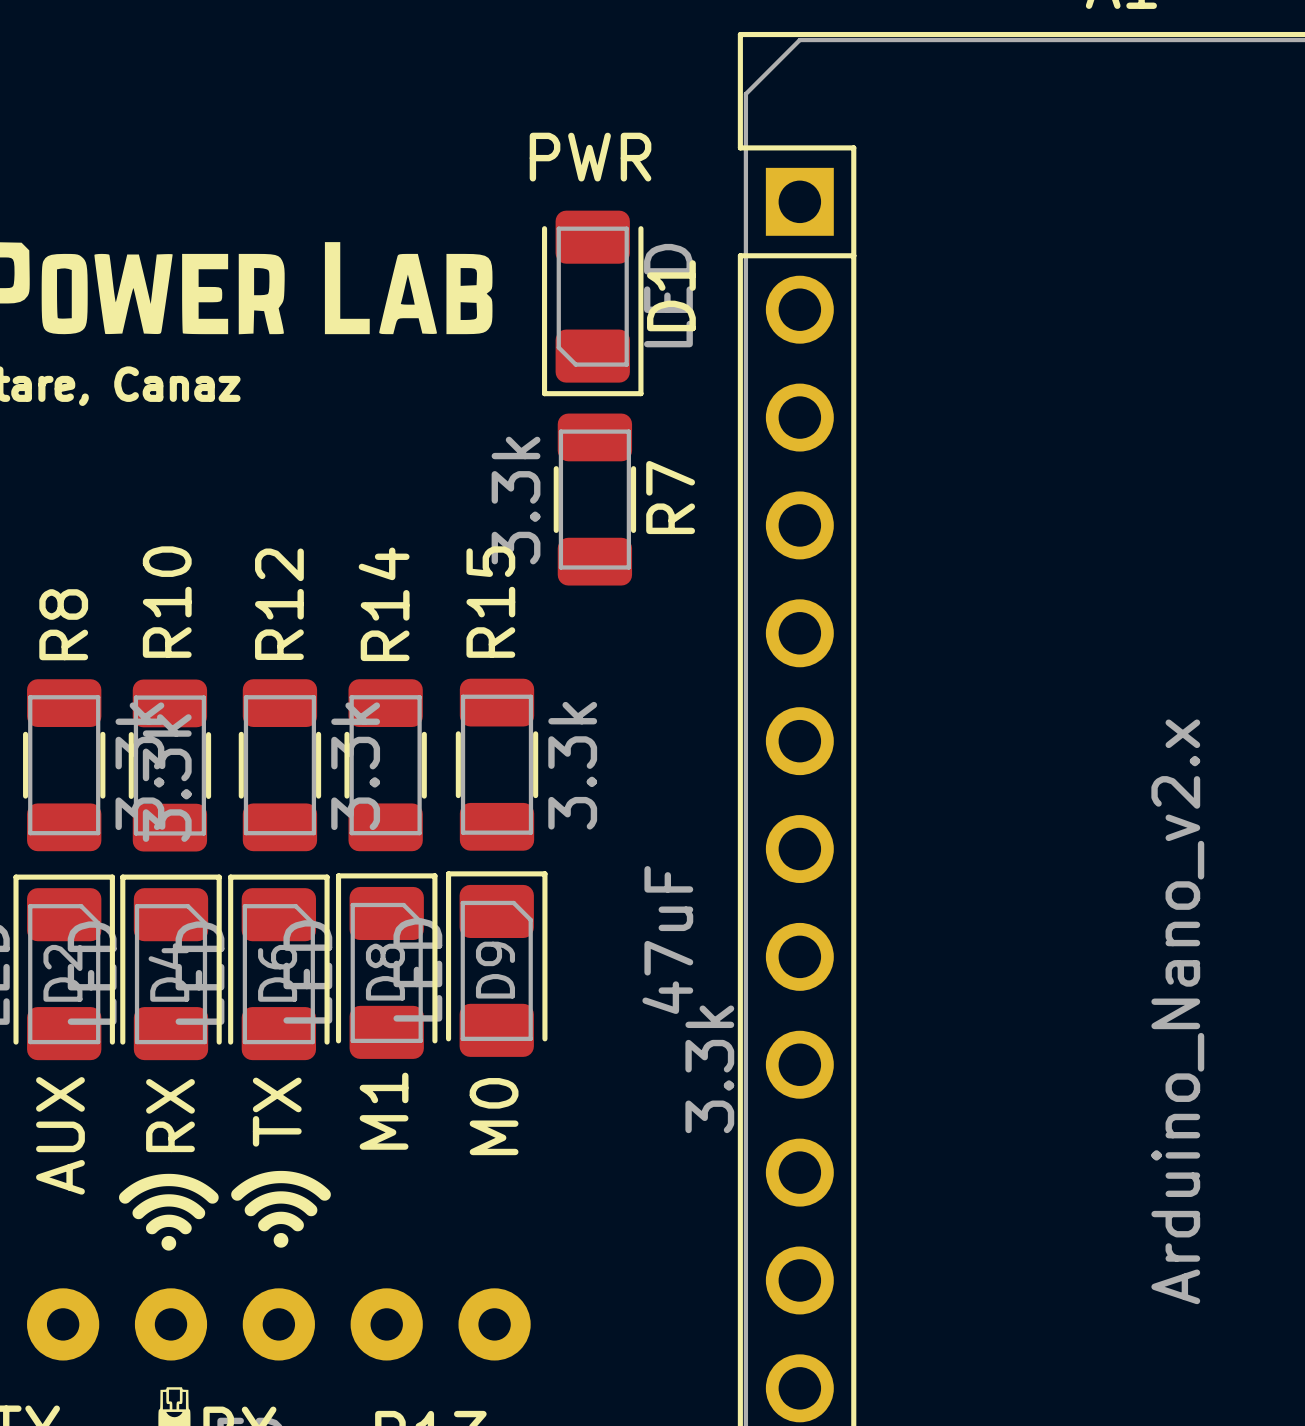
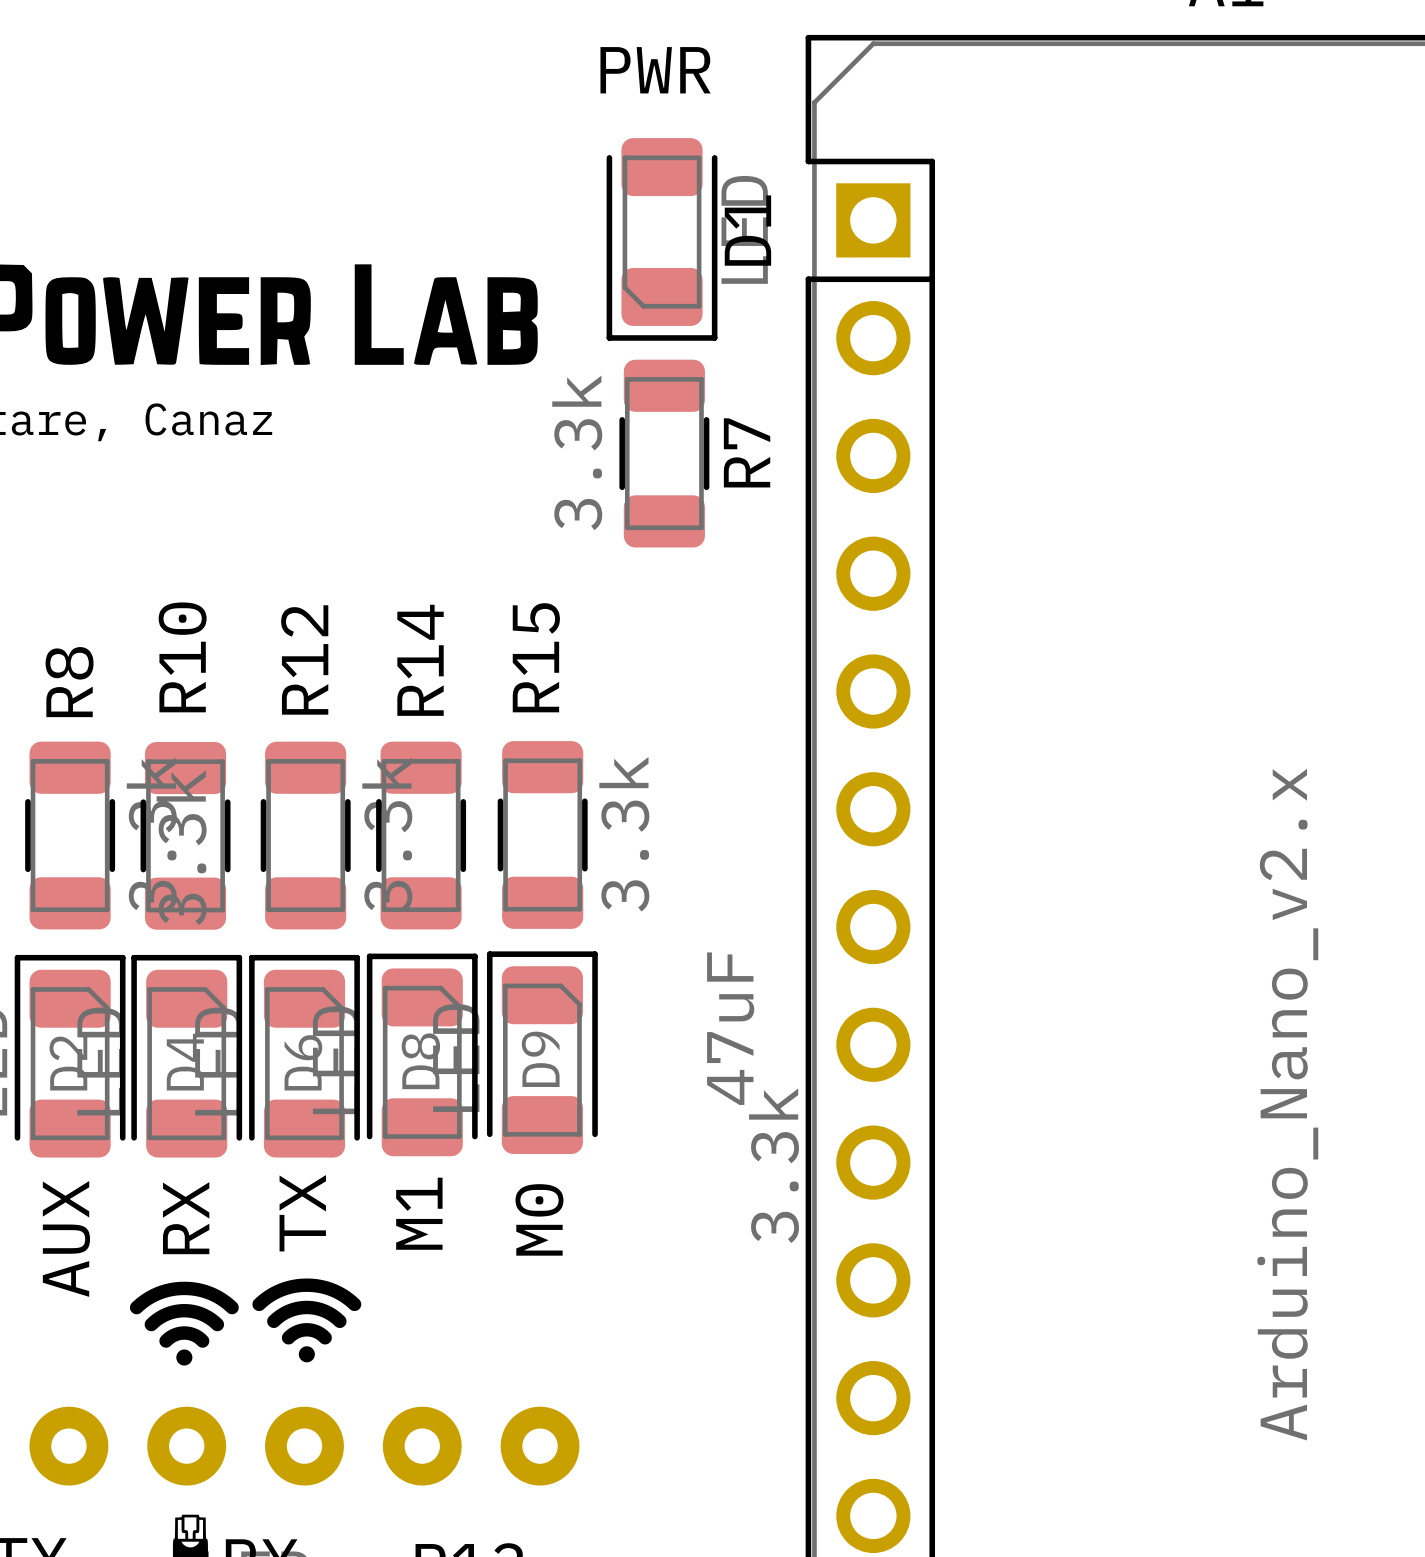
text position: PWR (590, 157) -> PWR (655, 70)
D1 position: (592, 303) -> (662, 239)
R7 position: (594, 499) -> (664, 453)

